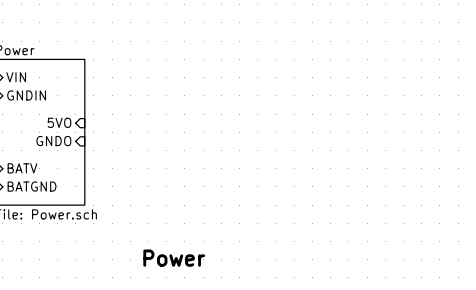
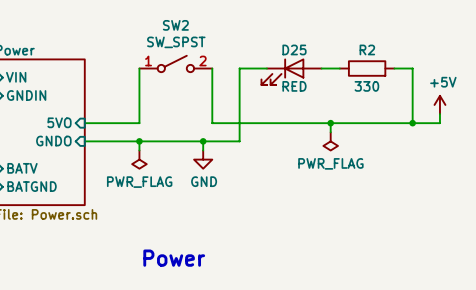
SW2: none -> SW_SPST (175, 63)
wire: none -> (139, 68) (139, 123) (84, 123)
wire: none -> (212, 68) (212, 123) (439, 123) (439, 114)
wire: none -> (266, 68) (239, 68) (239, 141) (84, 141)
wire: none -> (321, 68) (339, 68)
R2: none -> 330 (367, 68)
wire: none -> (394, 68) (412, 68) (412, 123)
D25: none -> RED (291, 71)
power symbol: none -> +5V (439, 104)
wire: none -> (330, 123) (330, 132)
junction: none -> (330, 123)
junction: none -> (412, 123)
wire: none -> (139, 141) (139, 150)
junction: none -> (139, 141)
wire: none -> (203, 141) (203, 150)
junction: none -> (203, 141)
power symbol: none -> PWR_FLAG (330, 141)
power symbol: none -> PWR_FLAG (139, 159)
power symbol: none -> GND (203, 159)

